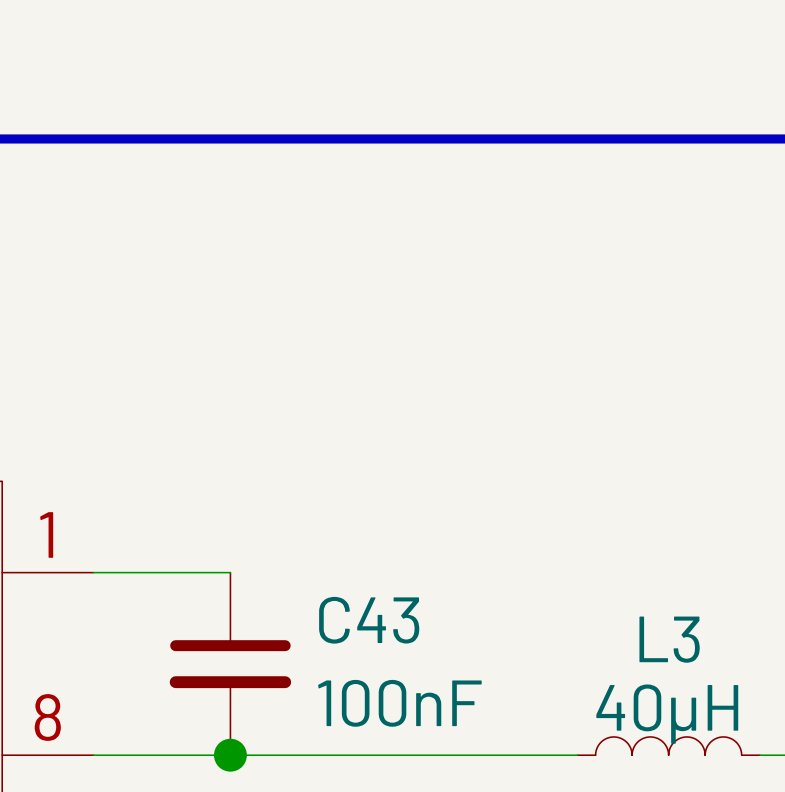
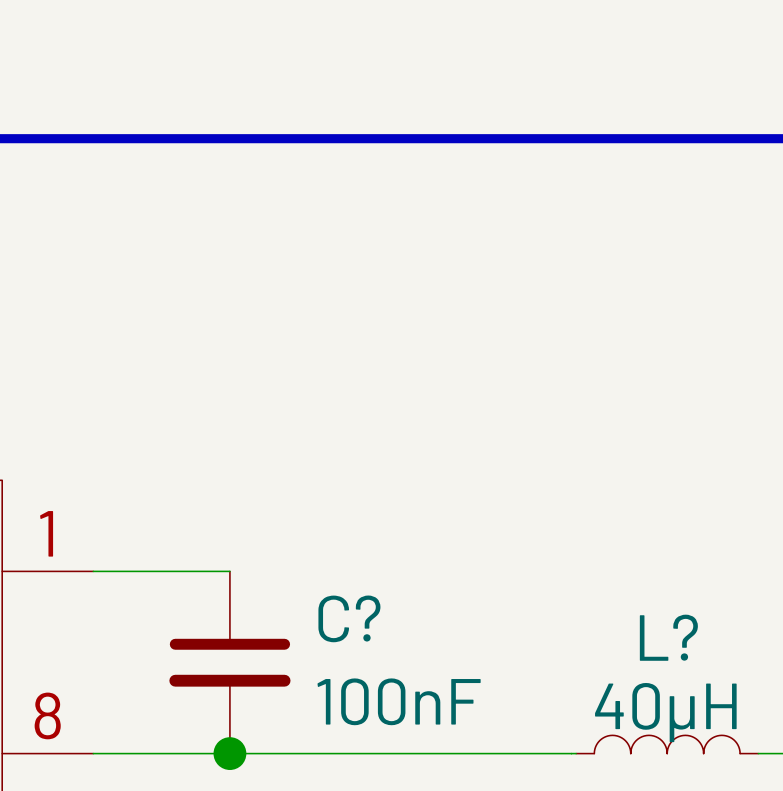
C43 name: C43 (369, 620) -> C? (349, 618)
L3 name: L3 (669, 639) -> L? (668, 637)

